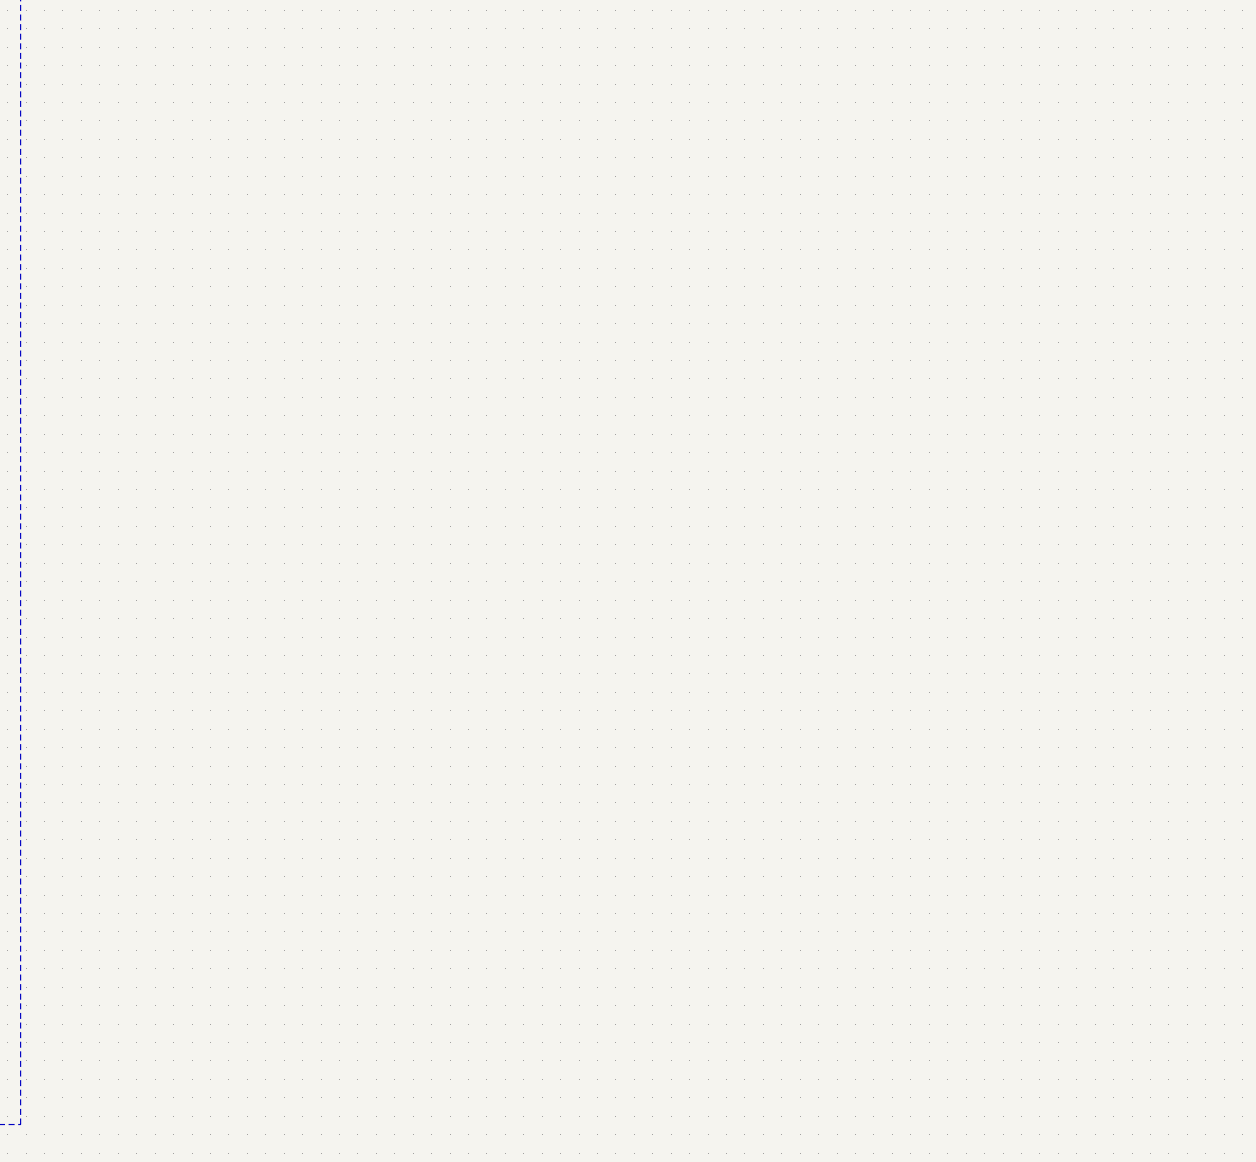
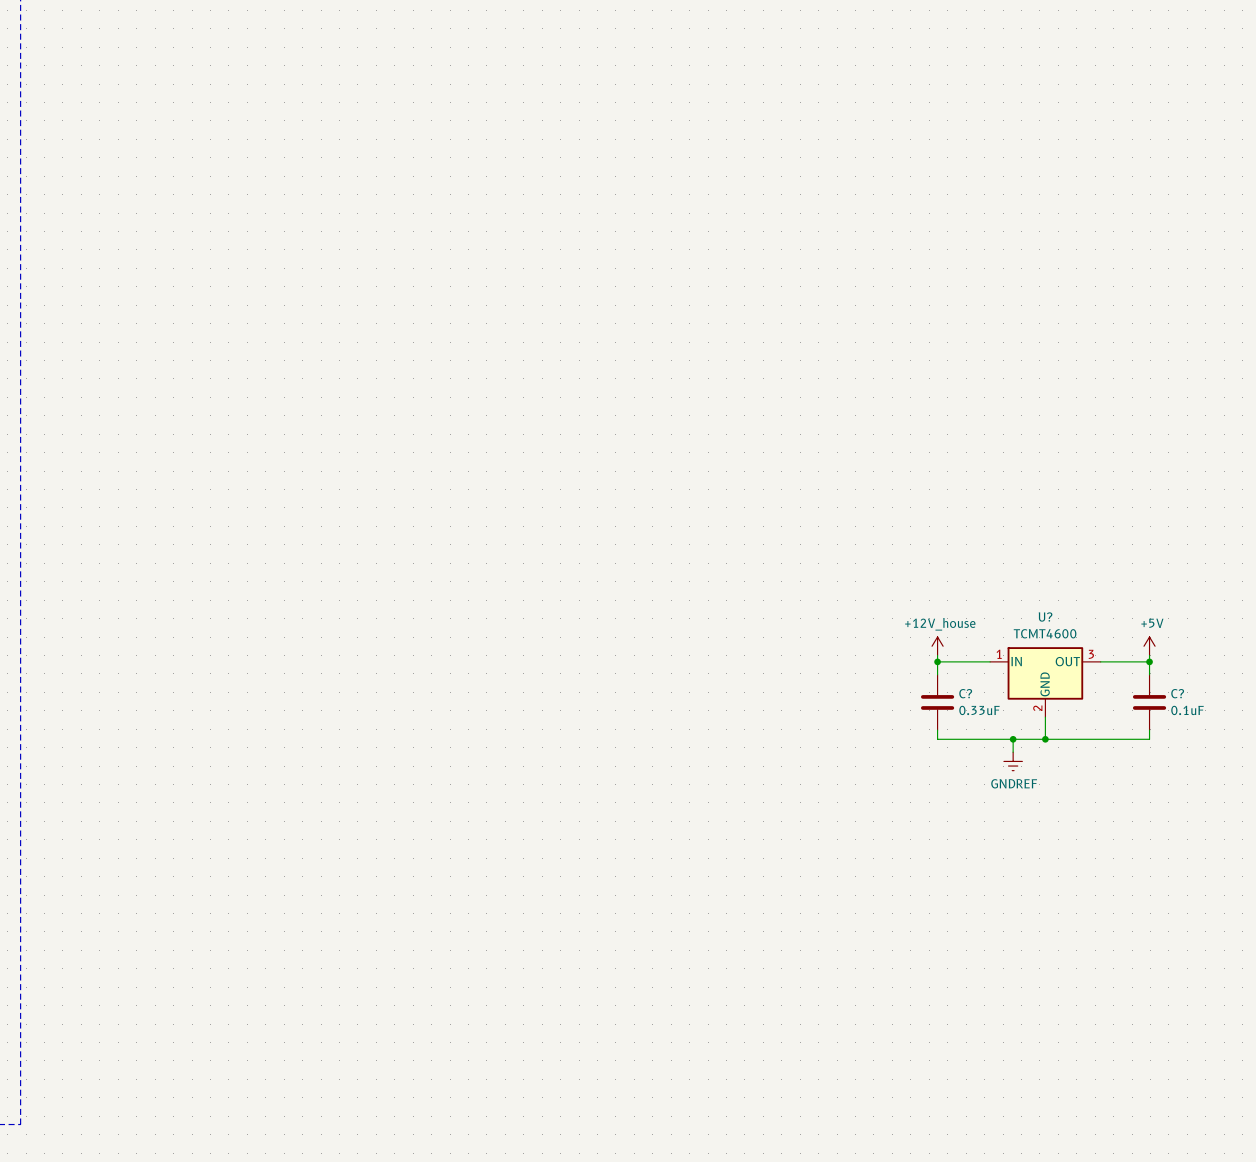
power symbol: none -> +12V_house (937, 646)
power symbol: none -> +5V (1149, 646)
wire: none -> (937, 655) (937, 674)
wire: none -> (1149, 655) (1149, 674)
wire: none -> (937, 661) (990, 661)
junction: none -> (937, 661)
wire: none -> (1100, 661) (1149, 661)
junction: none -> (1149, 661)
U?: none -> TCMT4600 (1045, 682)
C?: none -> 0.33uF (937, 702)
C?: none -> 0.1uF (1149, 702)
wire: none -> (1045, 717) (1045, 739)
wire: none -> (937, 730) (937, 739) (1149, 739) (1149, 730)
wire: none -> (1013, 739) (1013, 752)
junction: none -> (1013, 739)
junction: none -> (1045, 739)
power symbol: none -> GNDREF (1013, 761)

